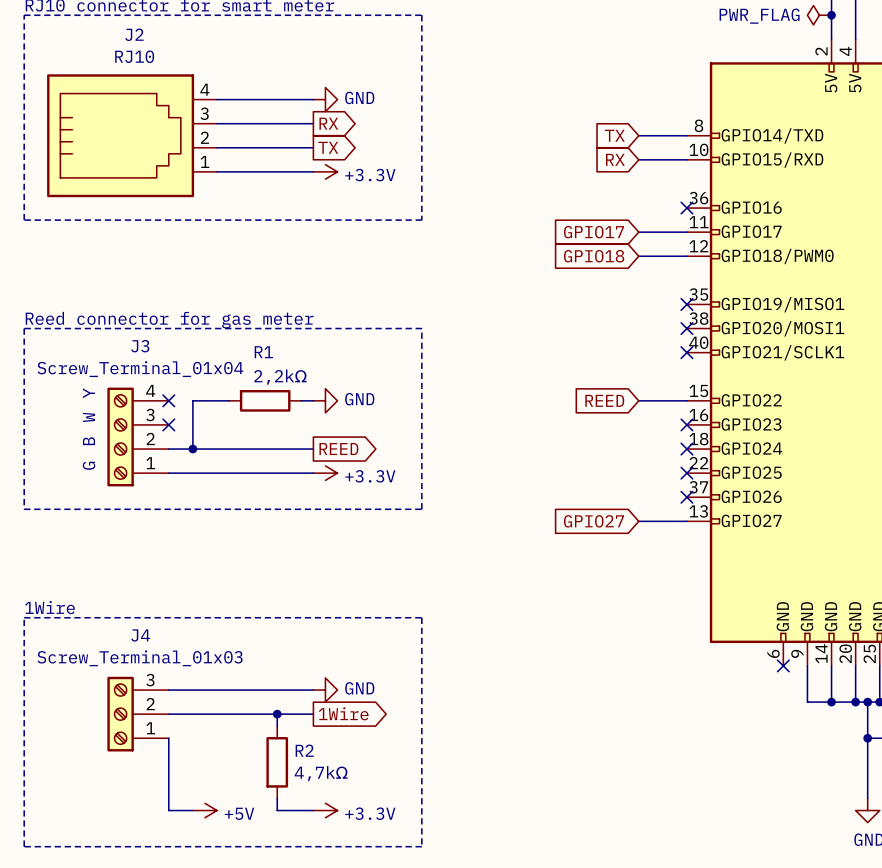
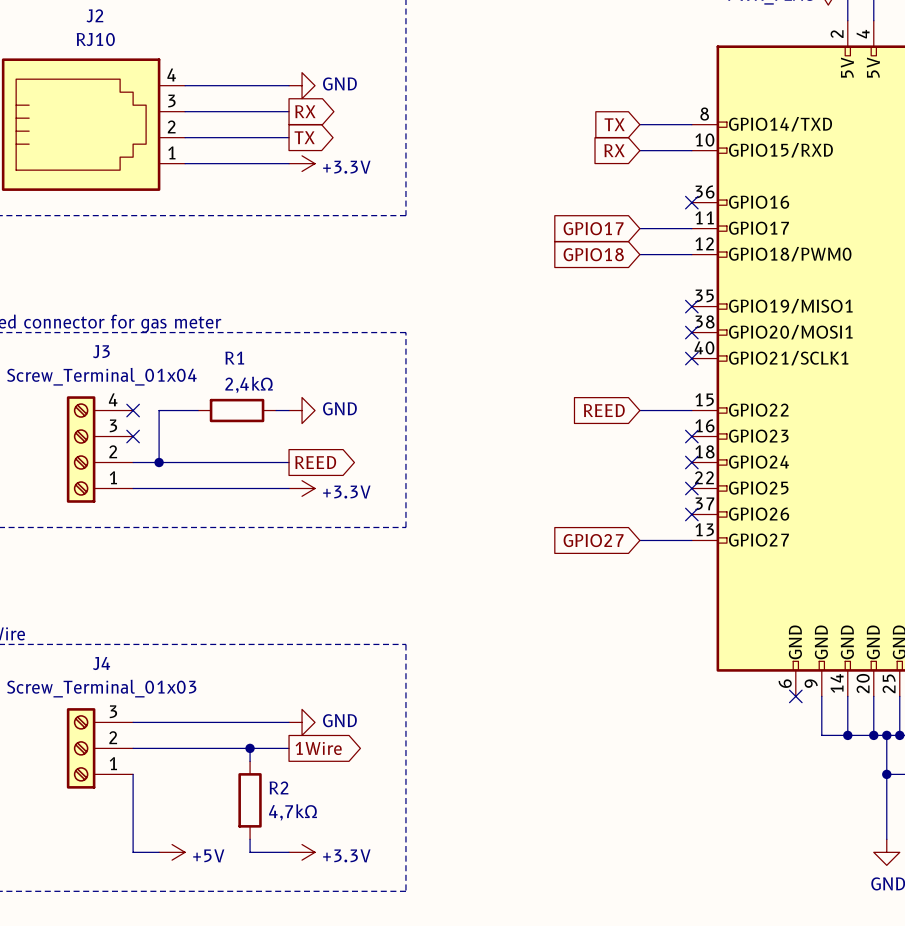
R1 value: 2,2kΩ (280, 377) -> 2,4kΩ (249, 384)
text: Y (89, 393) -> none
text: W (89, 417) -> none
text: B (89, 441) -> none
text: G (89, 465) -> none

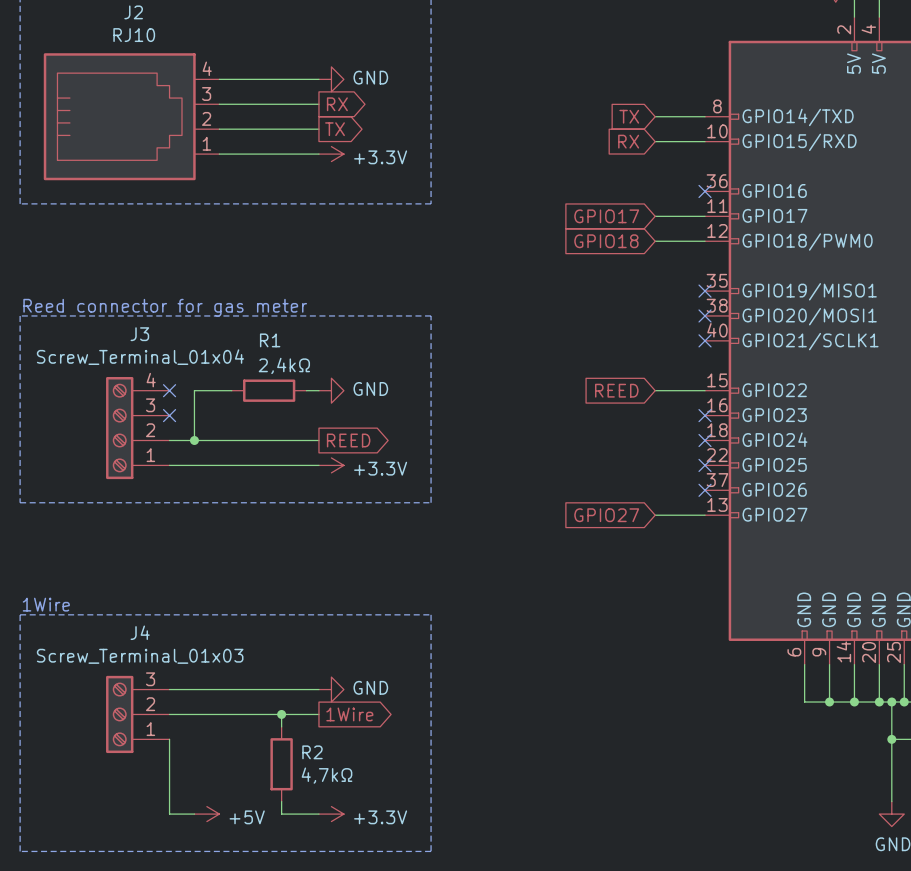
wire: none -> (804, 664) (804, 702) (829, 702)
no-connect mark: (795, 696) -> none
junction: none -> (829, 702)

